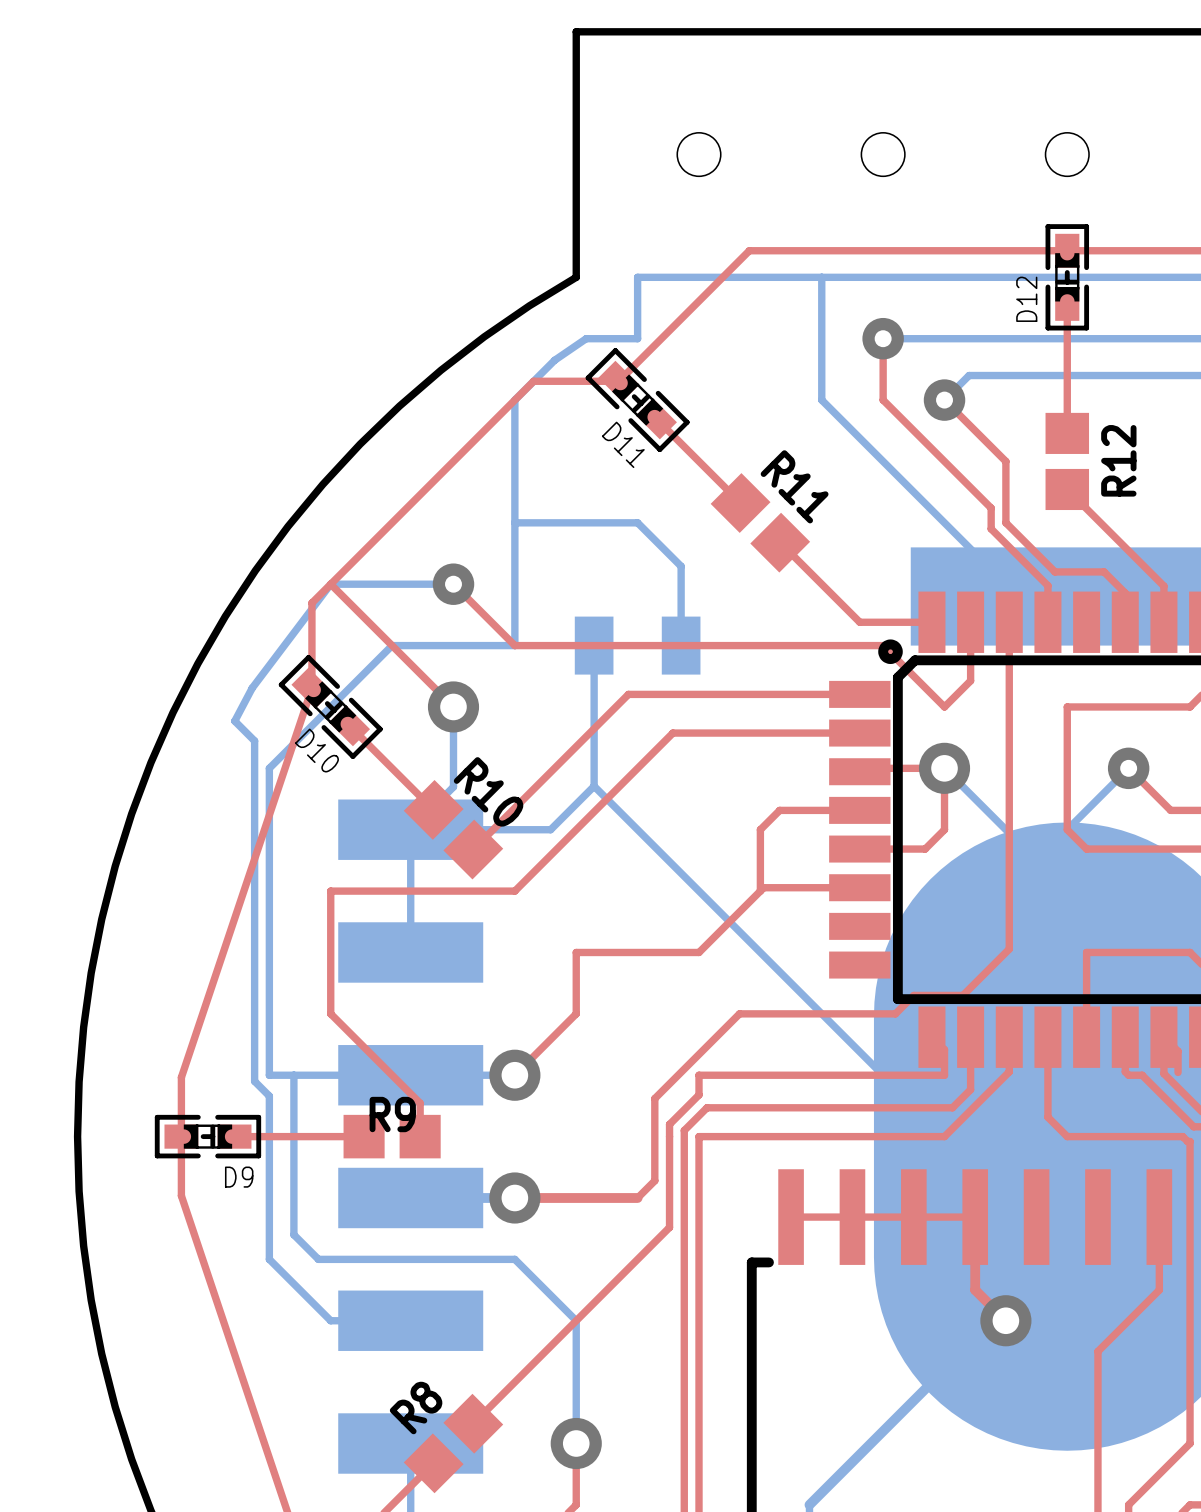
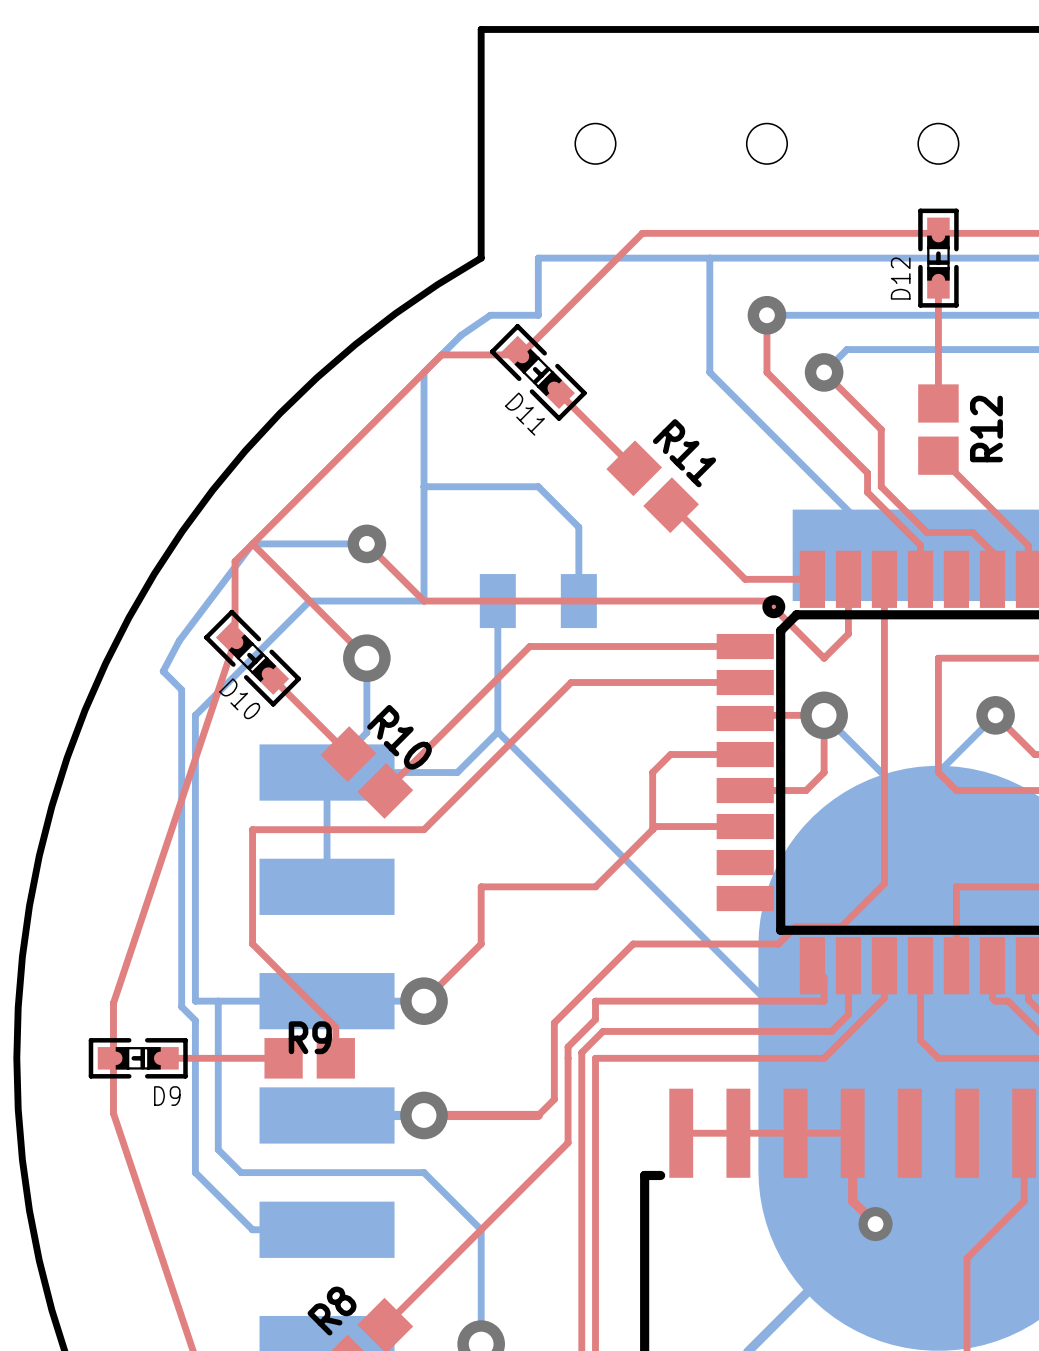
via size: [980, 1295, 1032, 1347] -> [858, 1207, 893, 1242]

